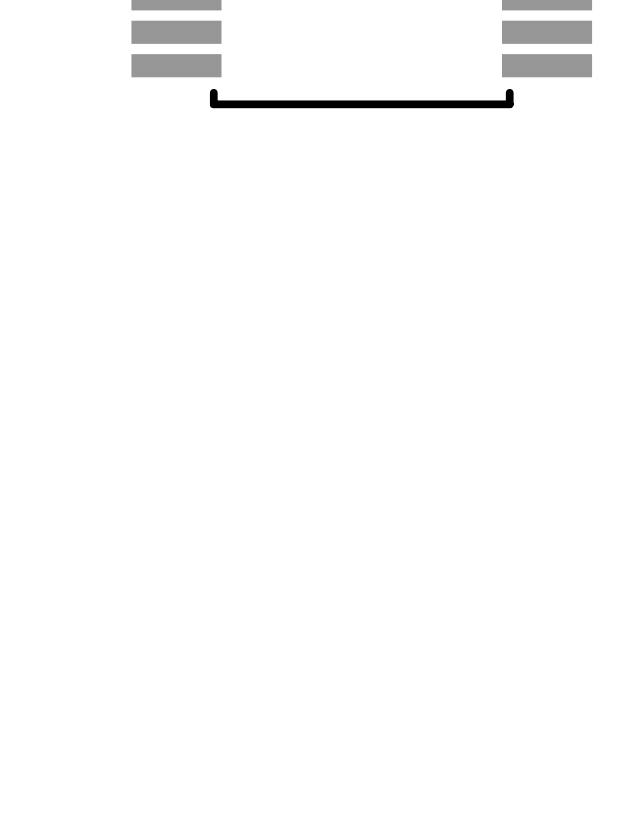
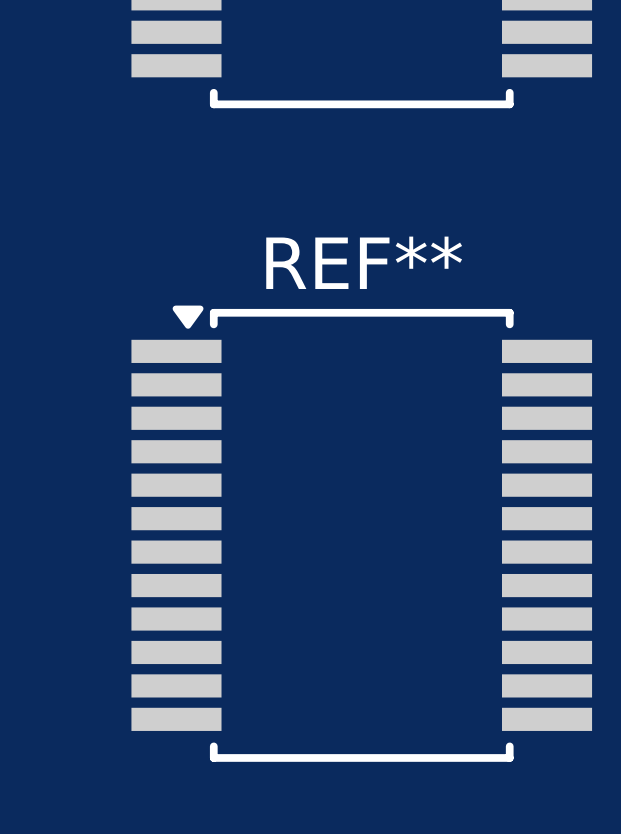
REF**: none -> (361, 533)

